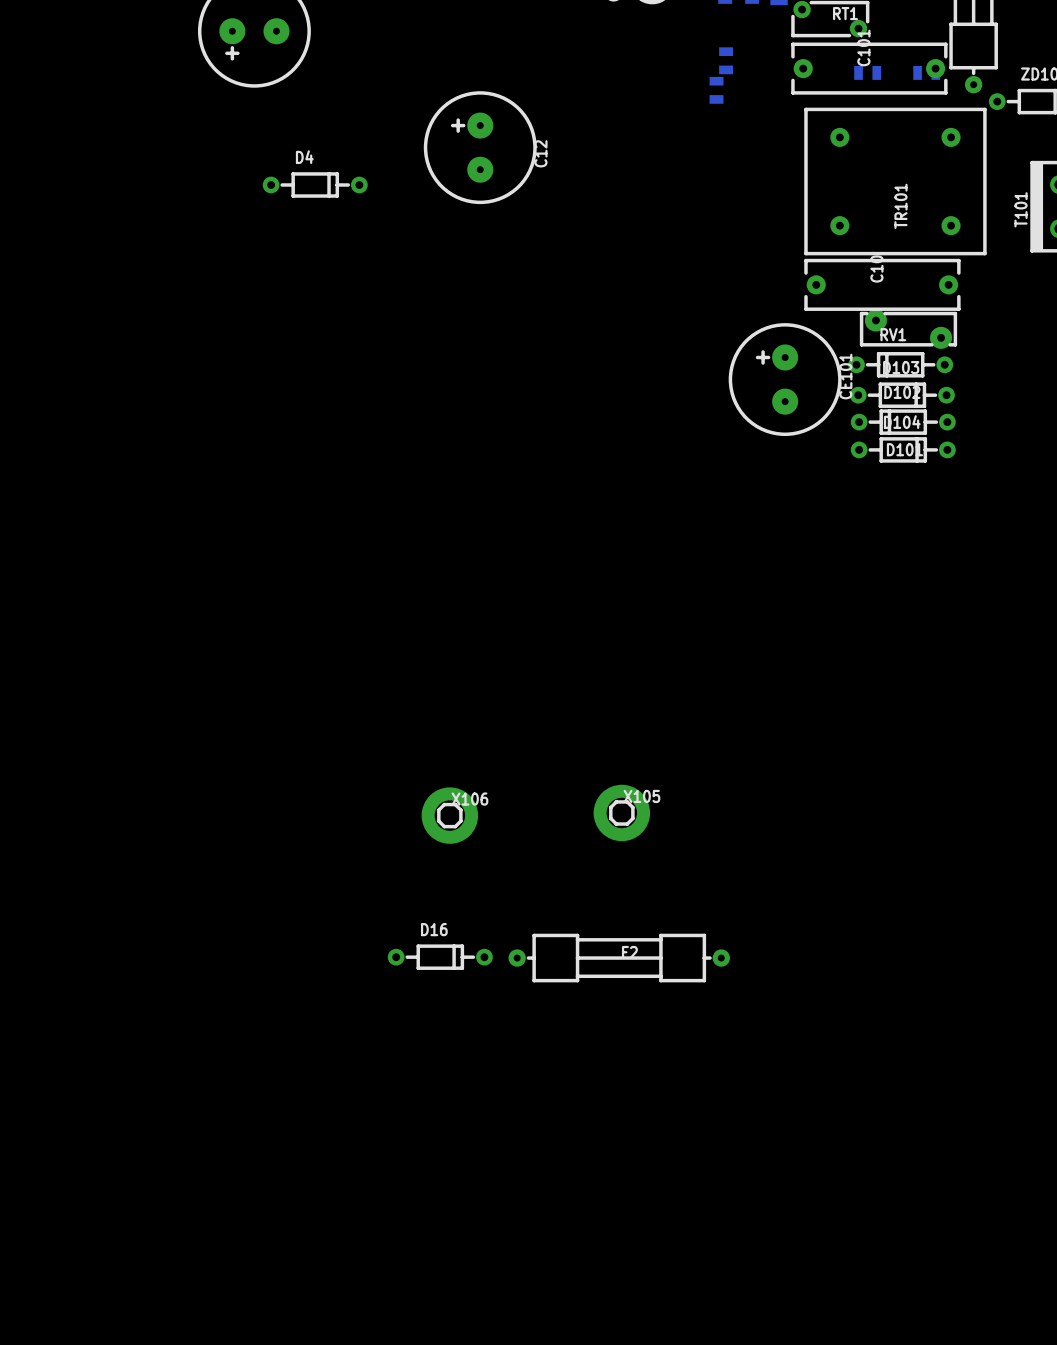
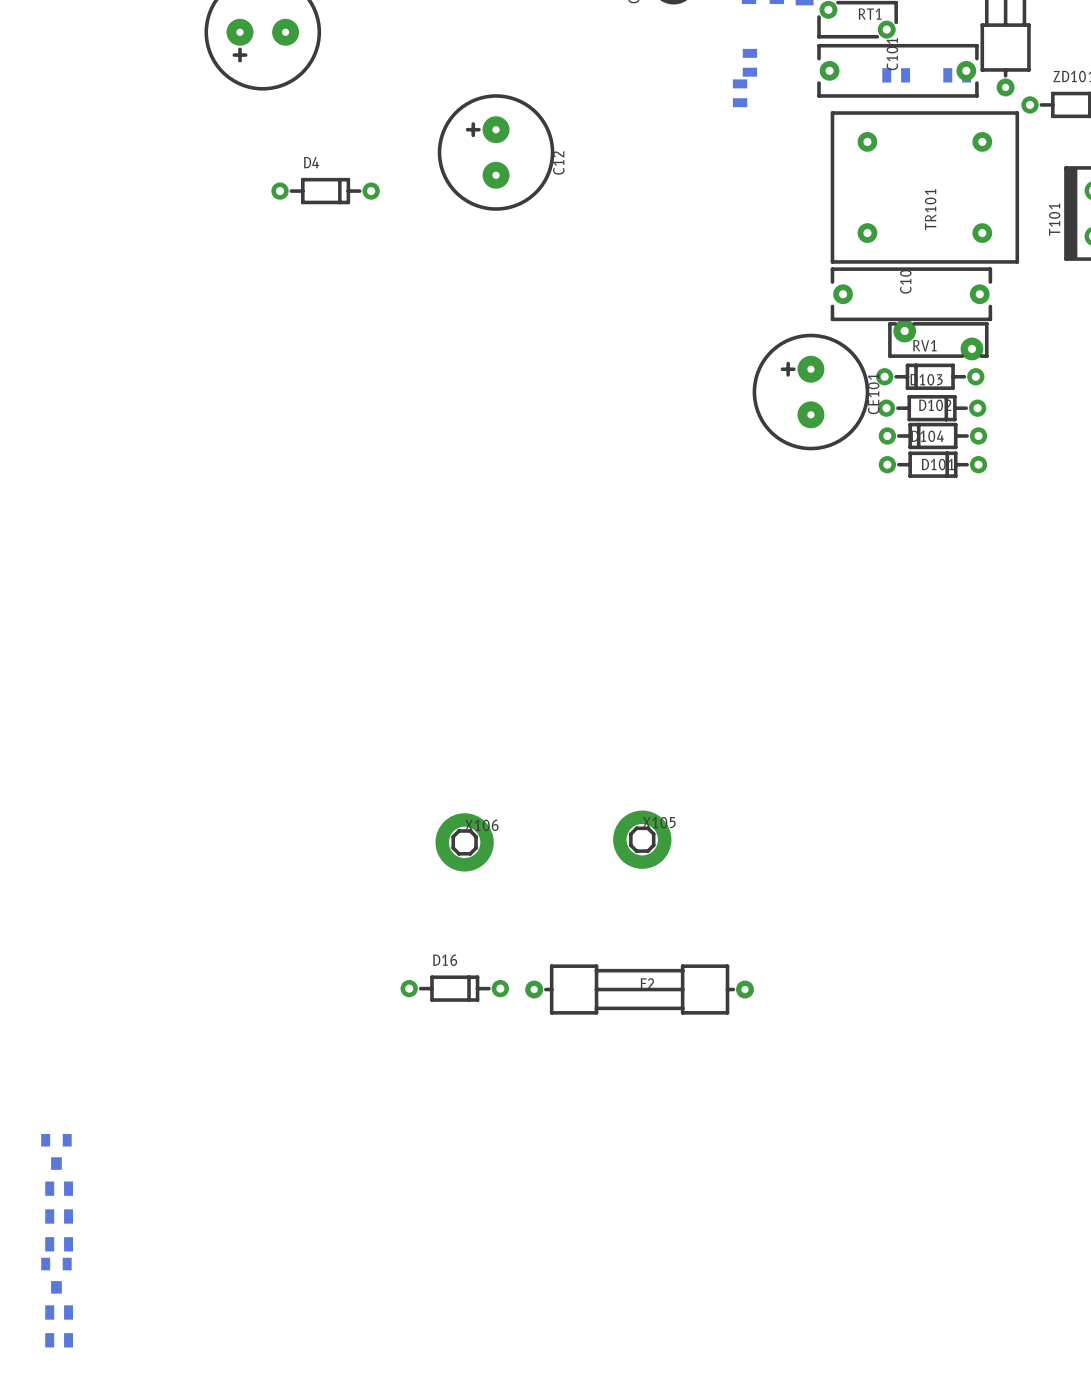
part: none -> (56, 1151)
part: none -> (59, 1188)
part: none -> (59, 1216)
part: none -> (59, 1244)
part: none -> (56, 1275)
part: none -> (59, 1312)
part: none -> (59, 1340)

